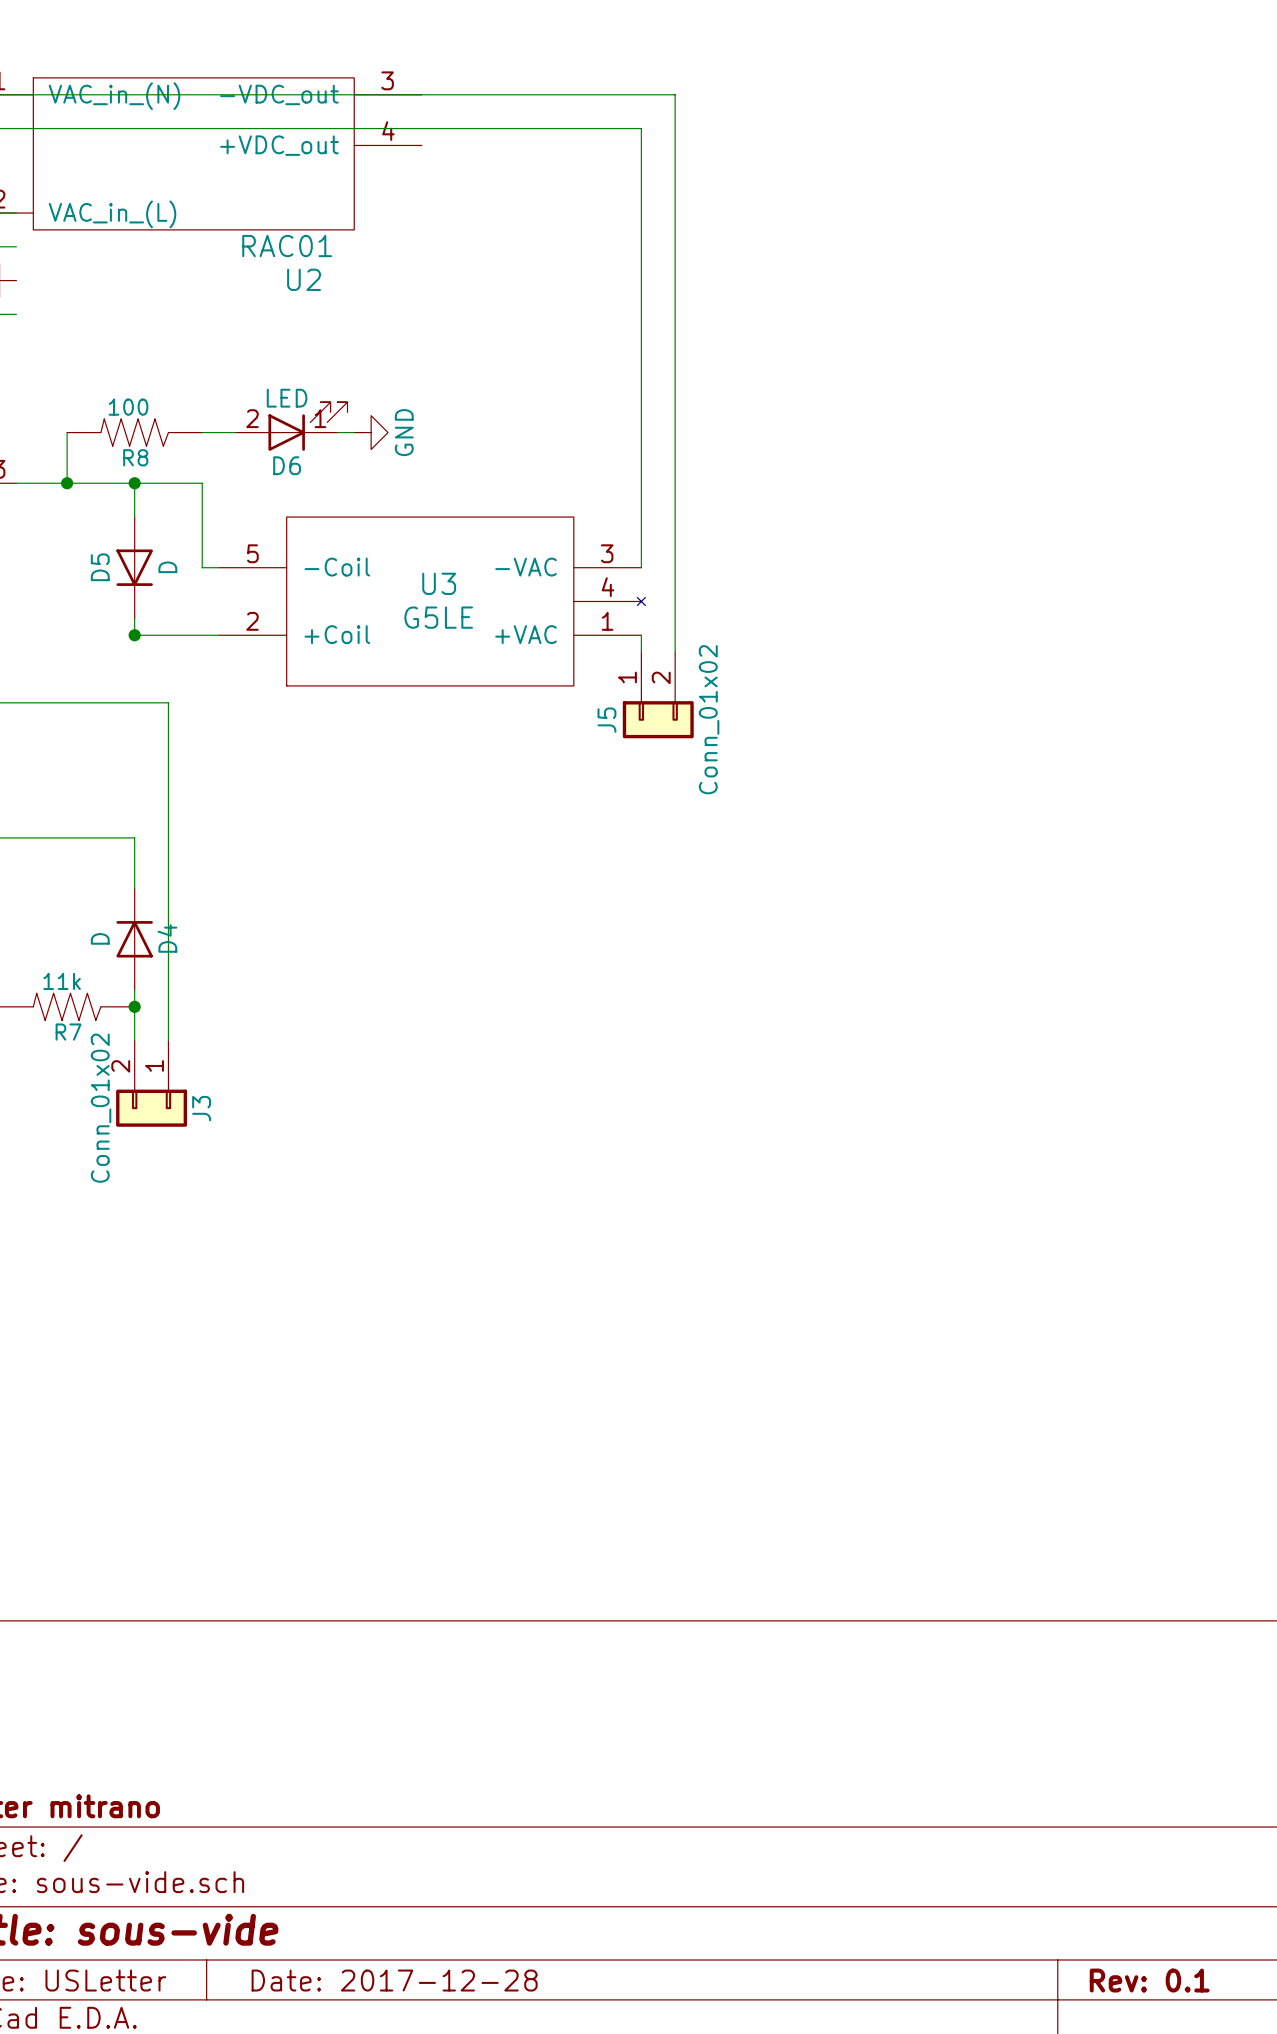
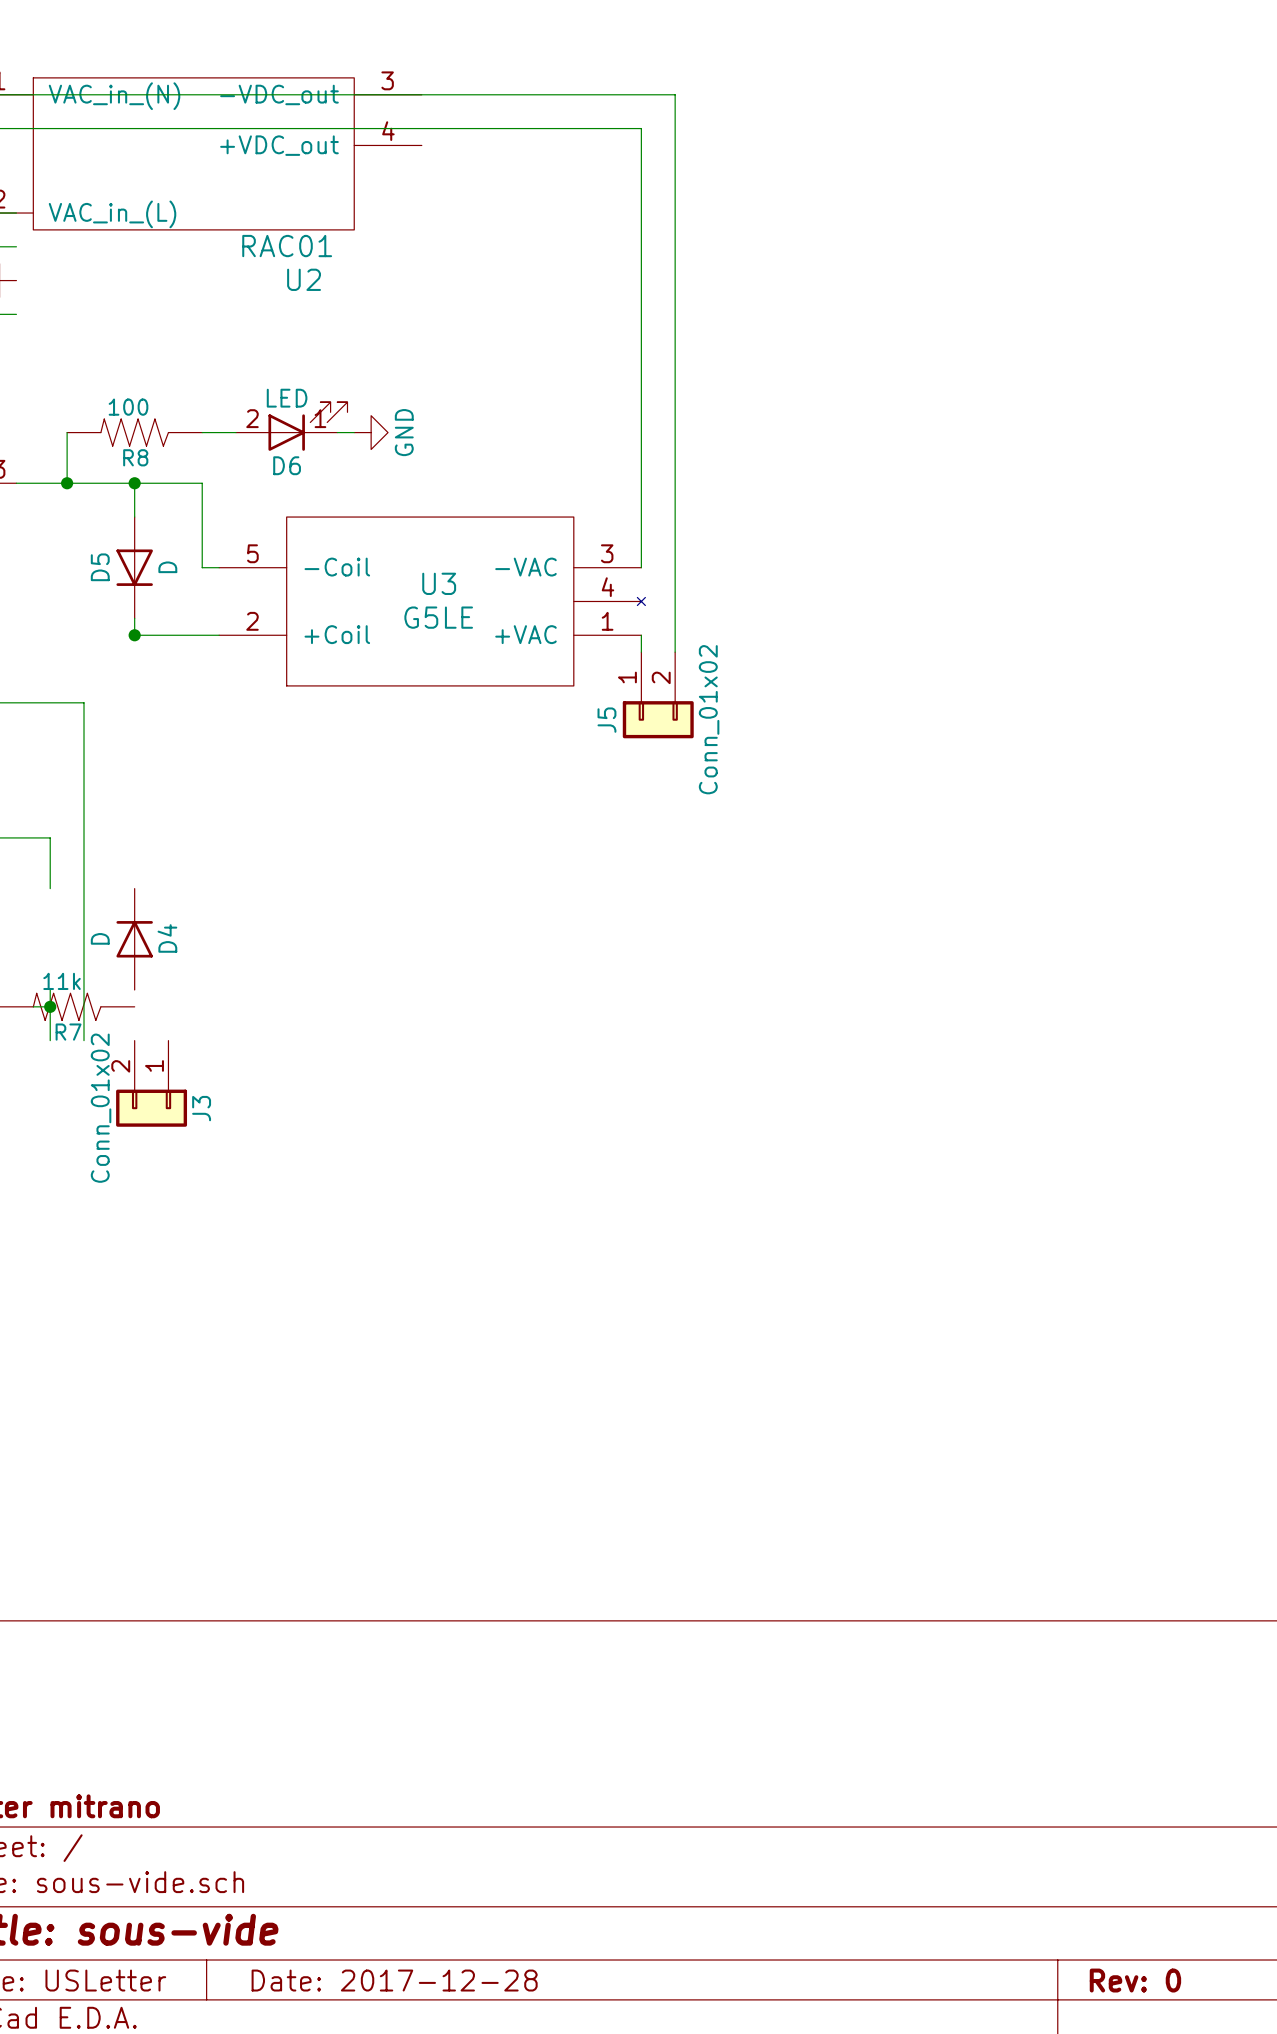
wire: (84, 702) (168, 702) (168, 1040) -> (84, 702) (84, 1040)
wire: (50, 837) (134, 837) (134, 888) -> (50, 837) (50, 888)
wire: (134, 989) (134, 1040) -> (50, 989) (50, 1040)
wire: none -> (33, 1006) (50, 1006)
junction: none -> (50, 1006)
junction: (134, 1006) -> none
title block: Rev: 0.1 (1149, 1980) -> Rev: 0 (1135, 1980)

